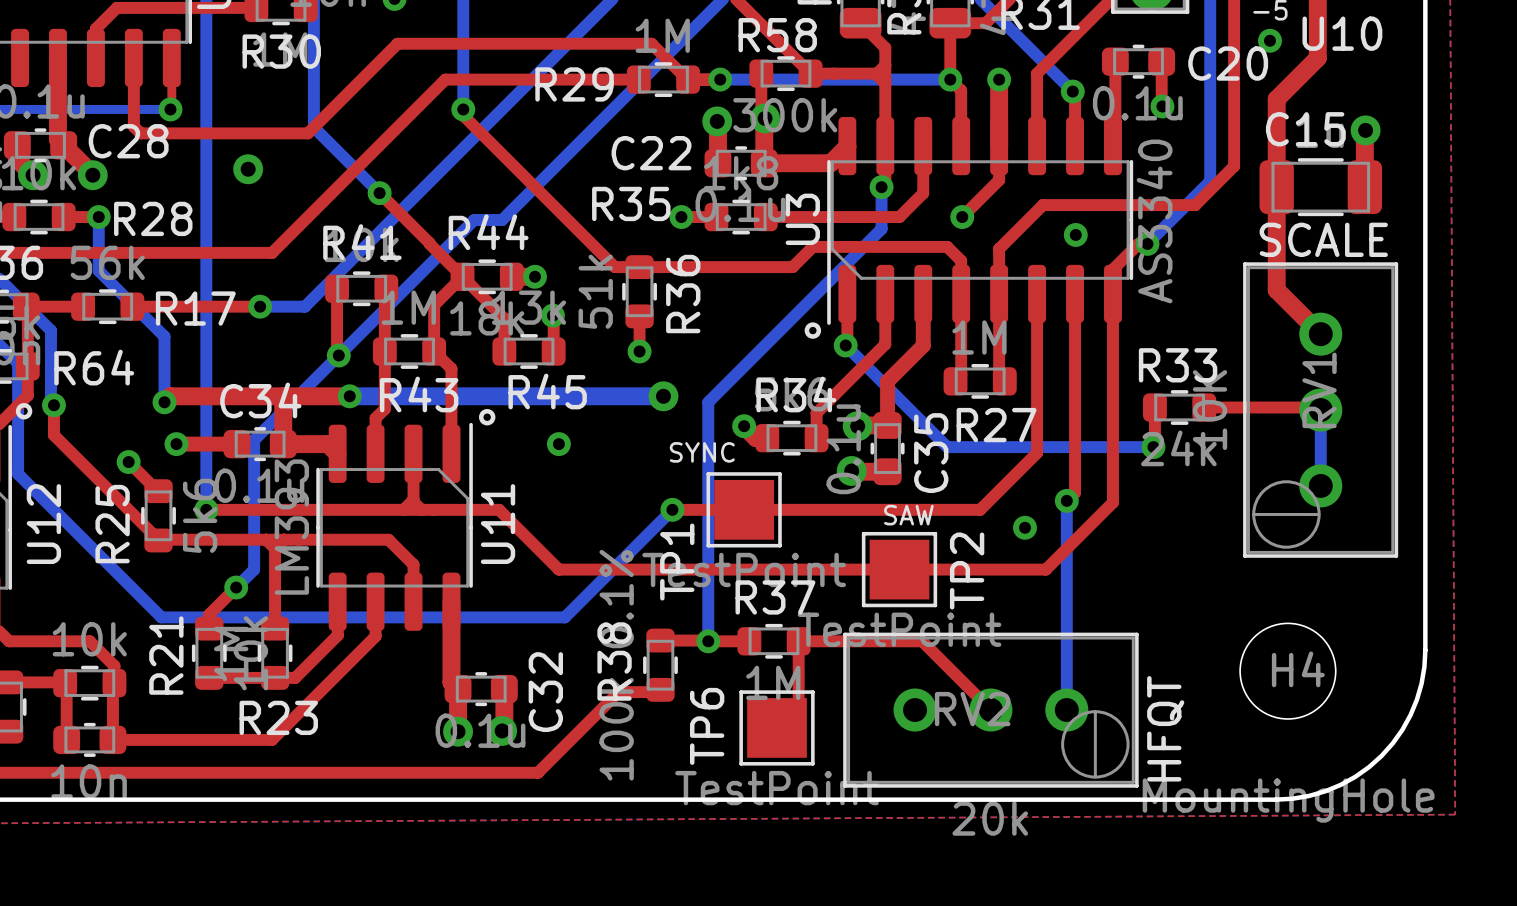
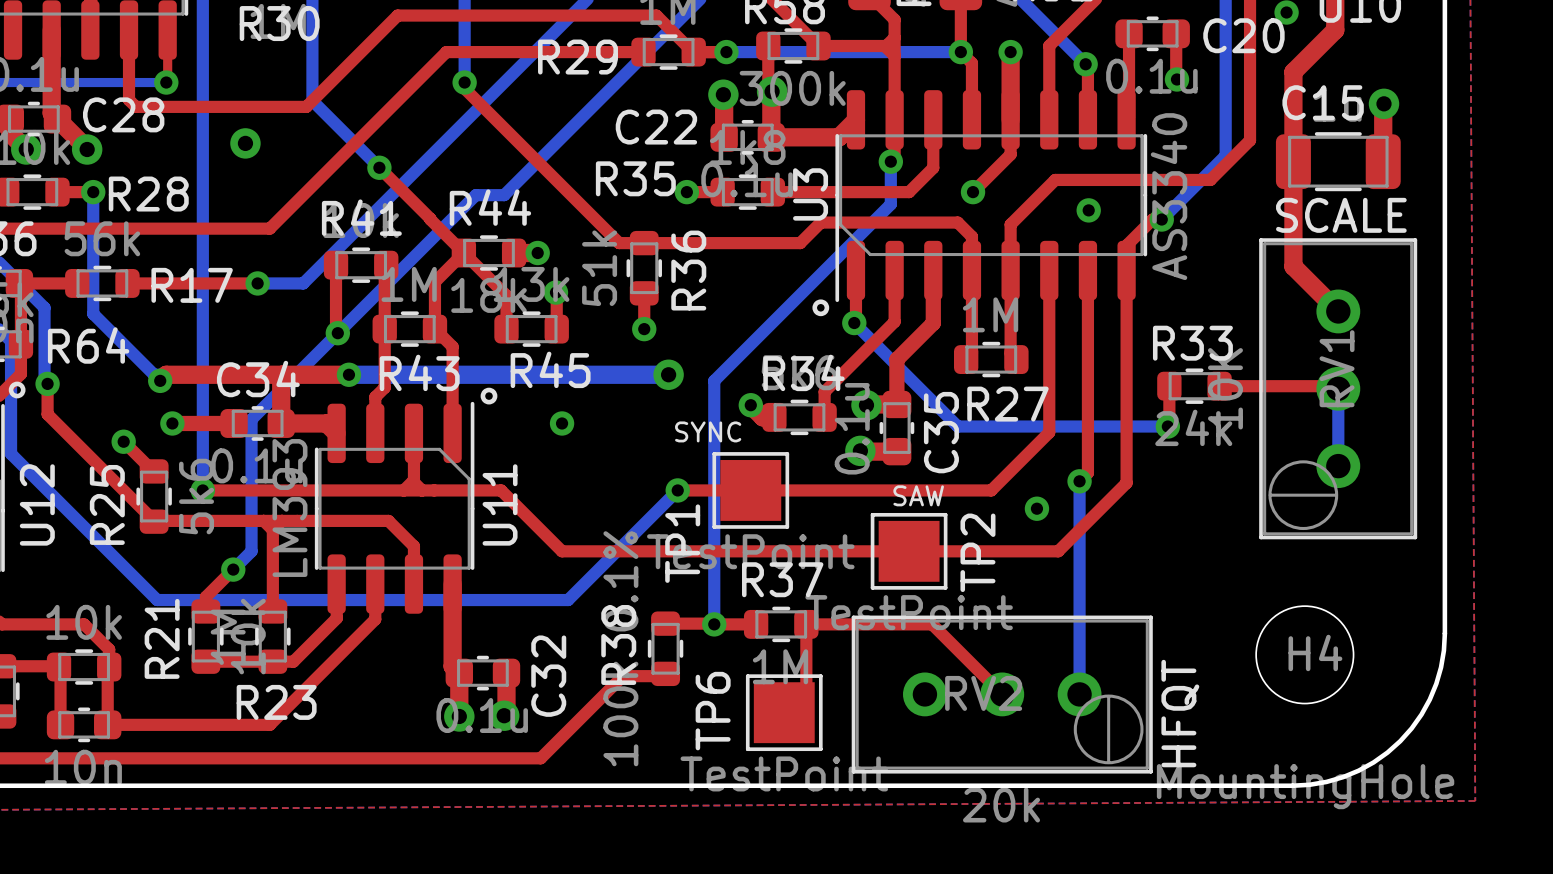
bottom track: (98, 270) (164, 336) (164, 402) -> (93, 246) (93, 313) (154, 374) (160, 374)

